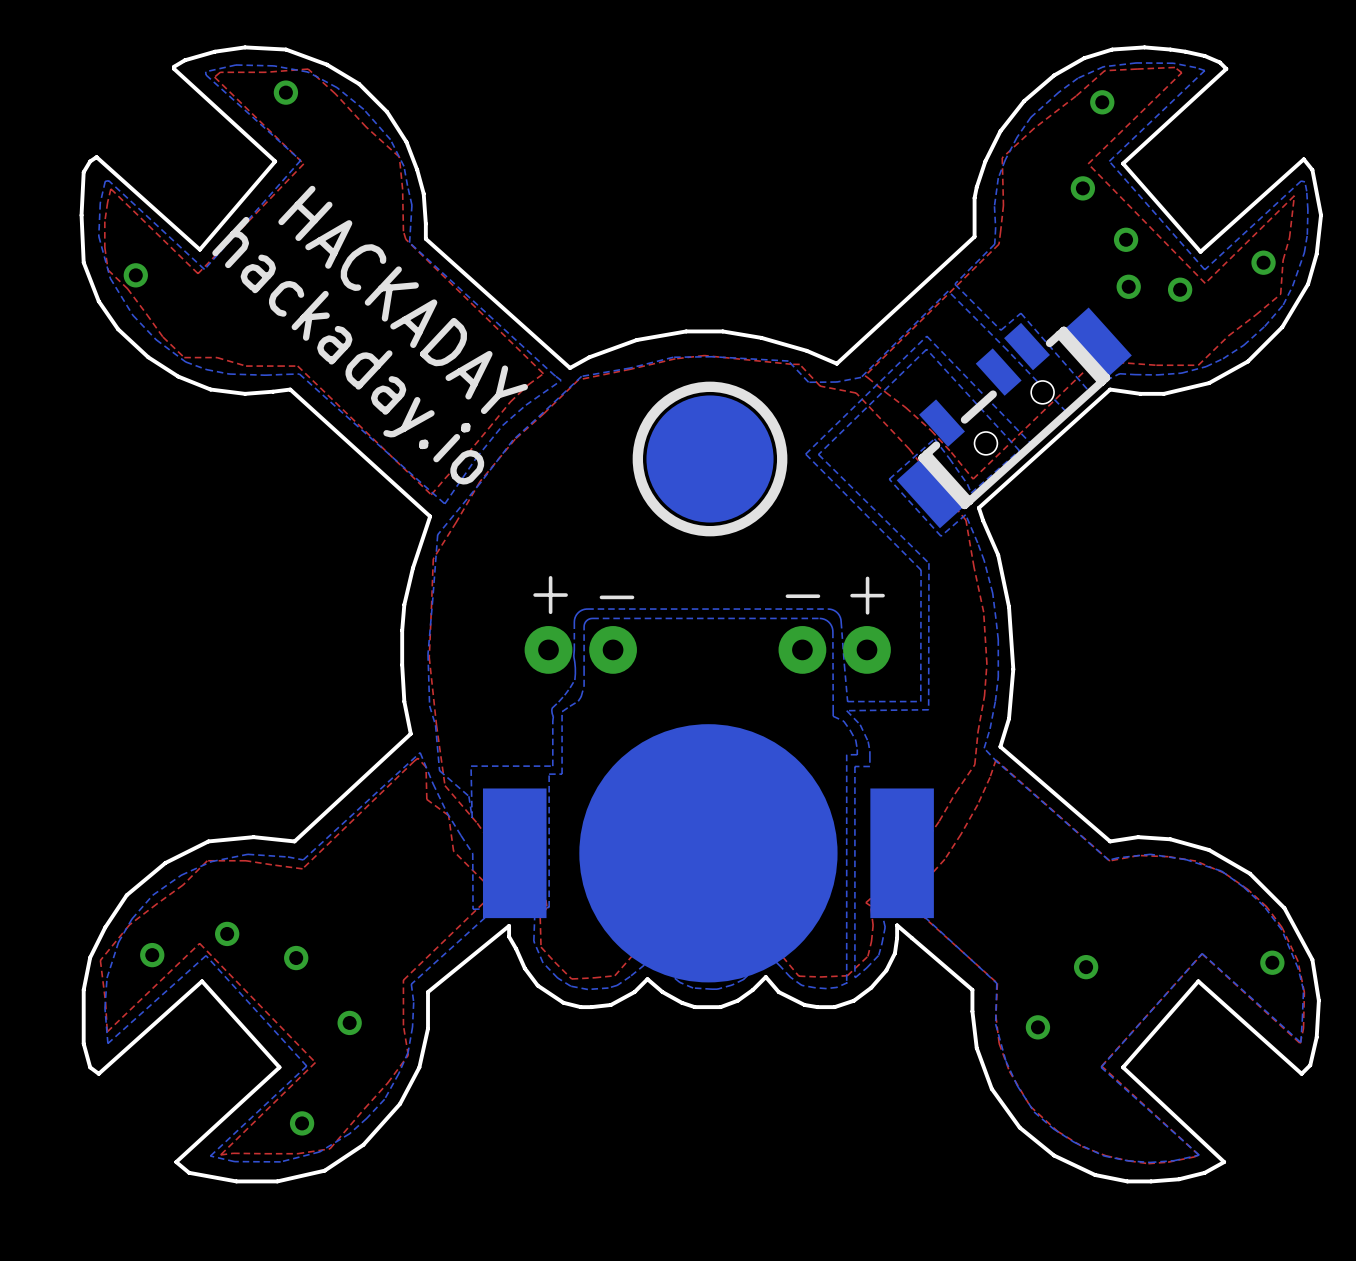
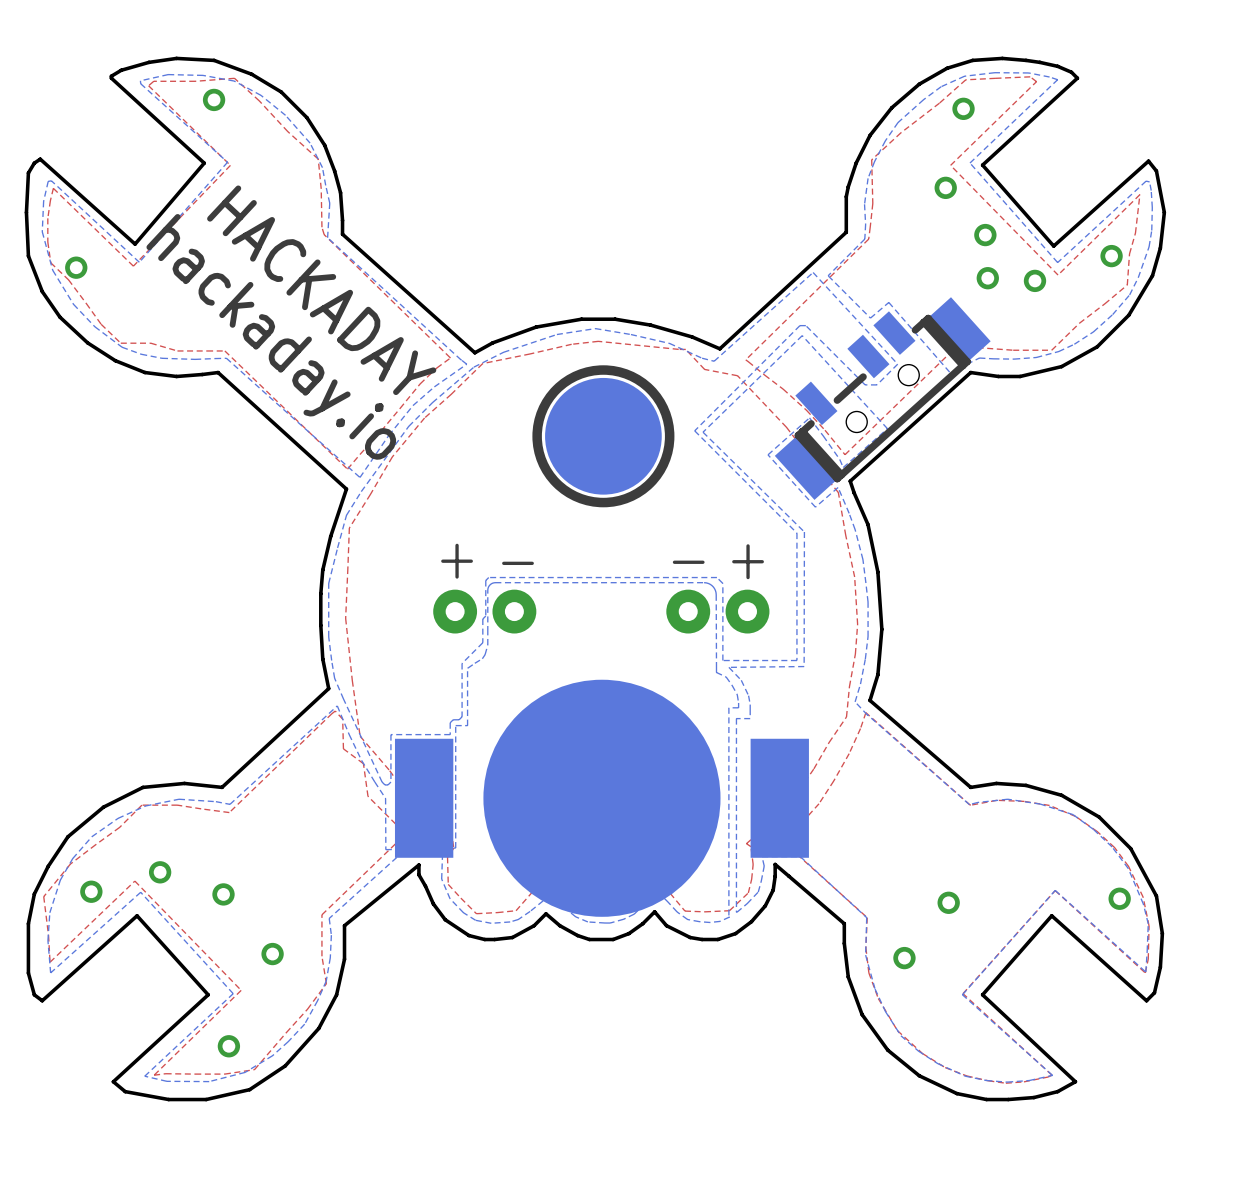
bottom zone outline: (948, 291) (1066, 411) (1032, 444) (926, 336) (805, 454) (921, 570) (920, 701) (847, 701) (841, 620) (837, 612) (831, 609) (583, 609) (578, 612) (574, 620) (574, 680) (564, 695) (552, 708) (552, 766) (471, 766) (472, 817) (468, 796) (439, 770) (435, 725) (429, 705) (428, 654) (437, 534) (513, 440) (581, 376) (630, 368) (673, 357) (712, 356) (788, 361) (808, 382) (836, 382) (861, 377) (948, 291) -> (813, 272) (897, 364) (876, 384) (865, 384) (805, 325) (799, 325) (694, 430) (796, 533) (796, 660) (722, 660) (722, 583) (716, 577) (488, 577) (485, 580) (485, 616) (482, 619) (482, 642) (462, 663) (462, 716) (450, 722) (450, 734) (390, 734) (390, 782) (385, 784) (334, 678) (328, 636) (328, 583) (346, 515) (408, 426) (432, 402) (473, 367) (503, 352) (556, 334) (595, 328) (630, 334) (669, 343) (702, 358) (714, 361) (813, 272)

